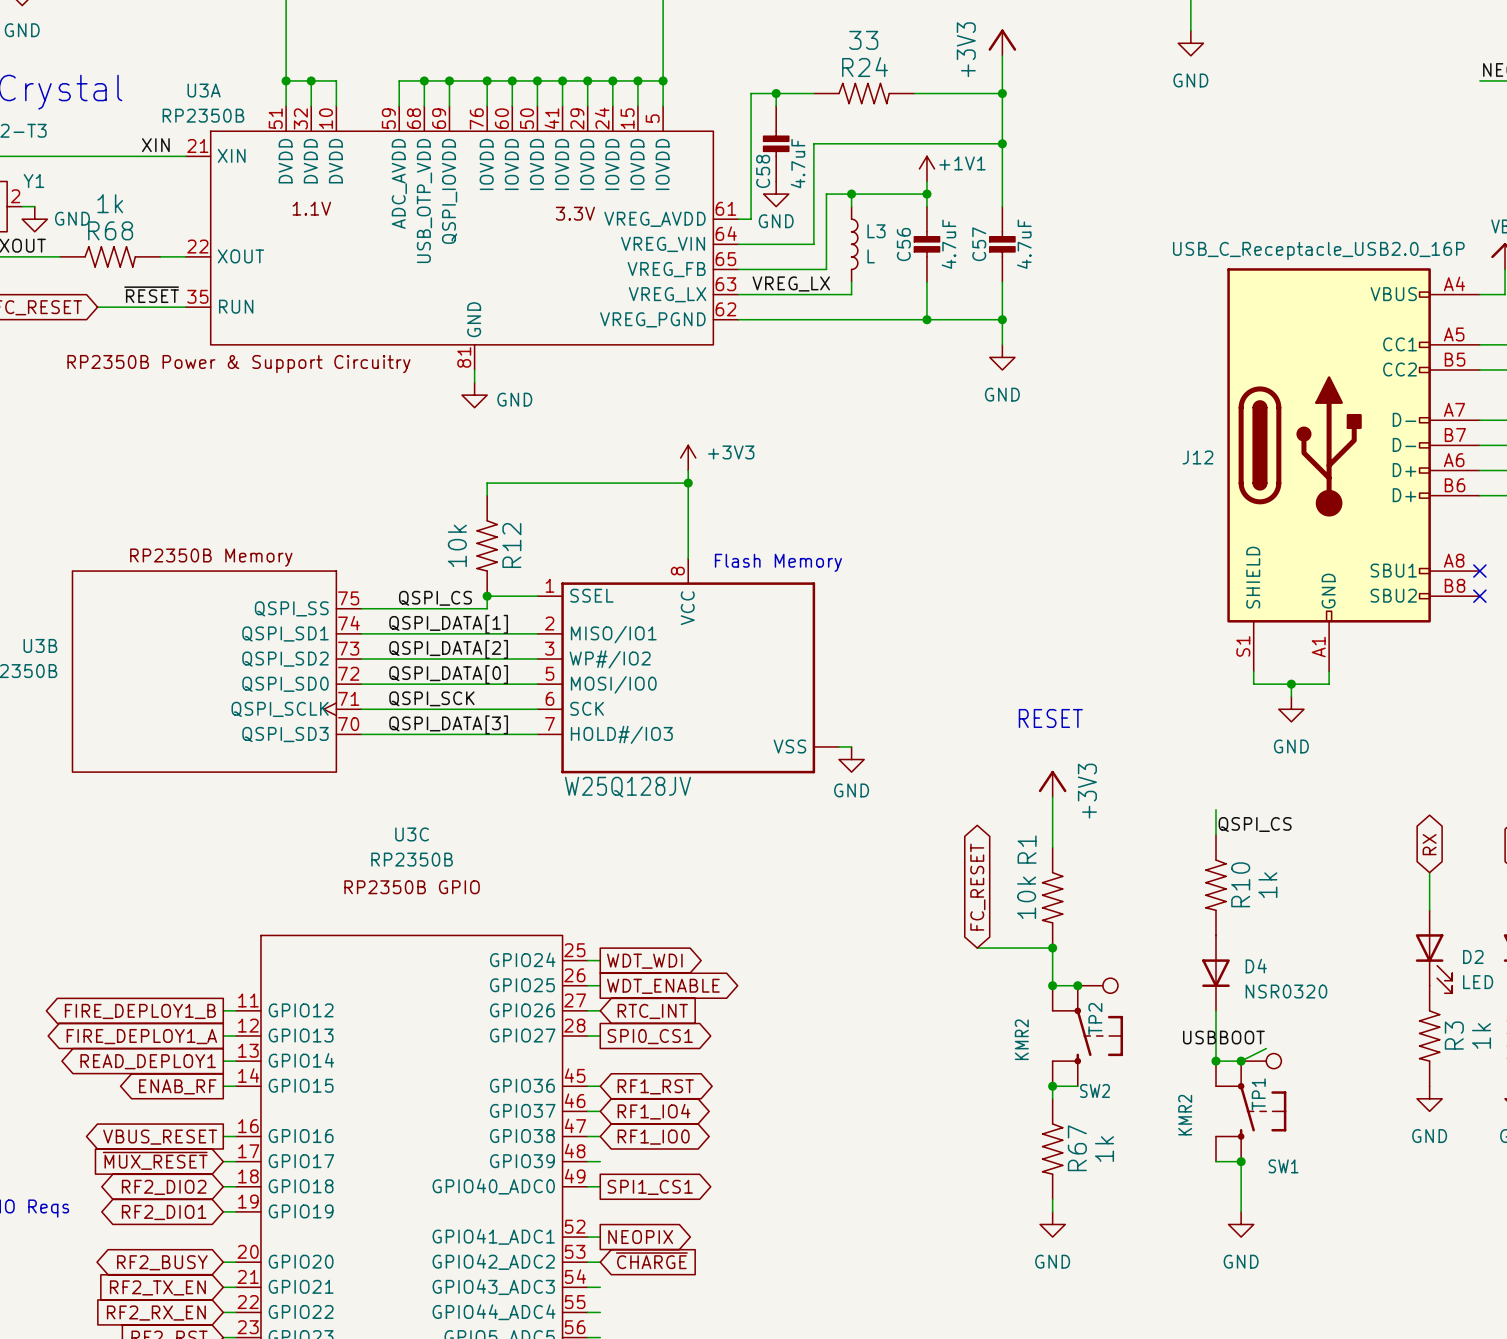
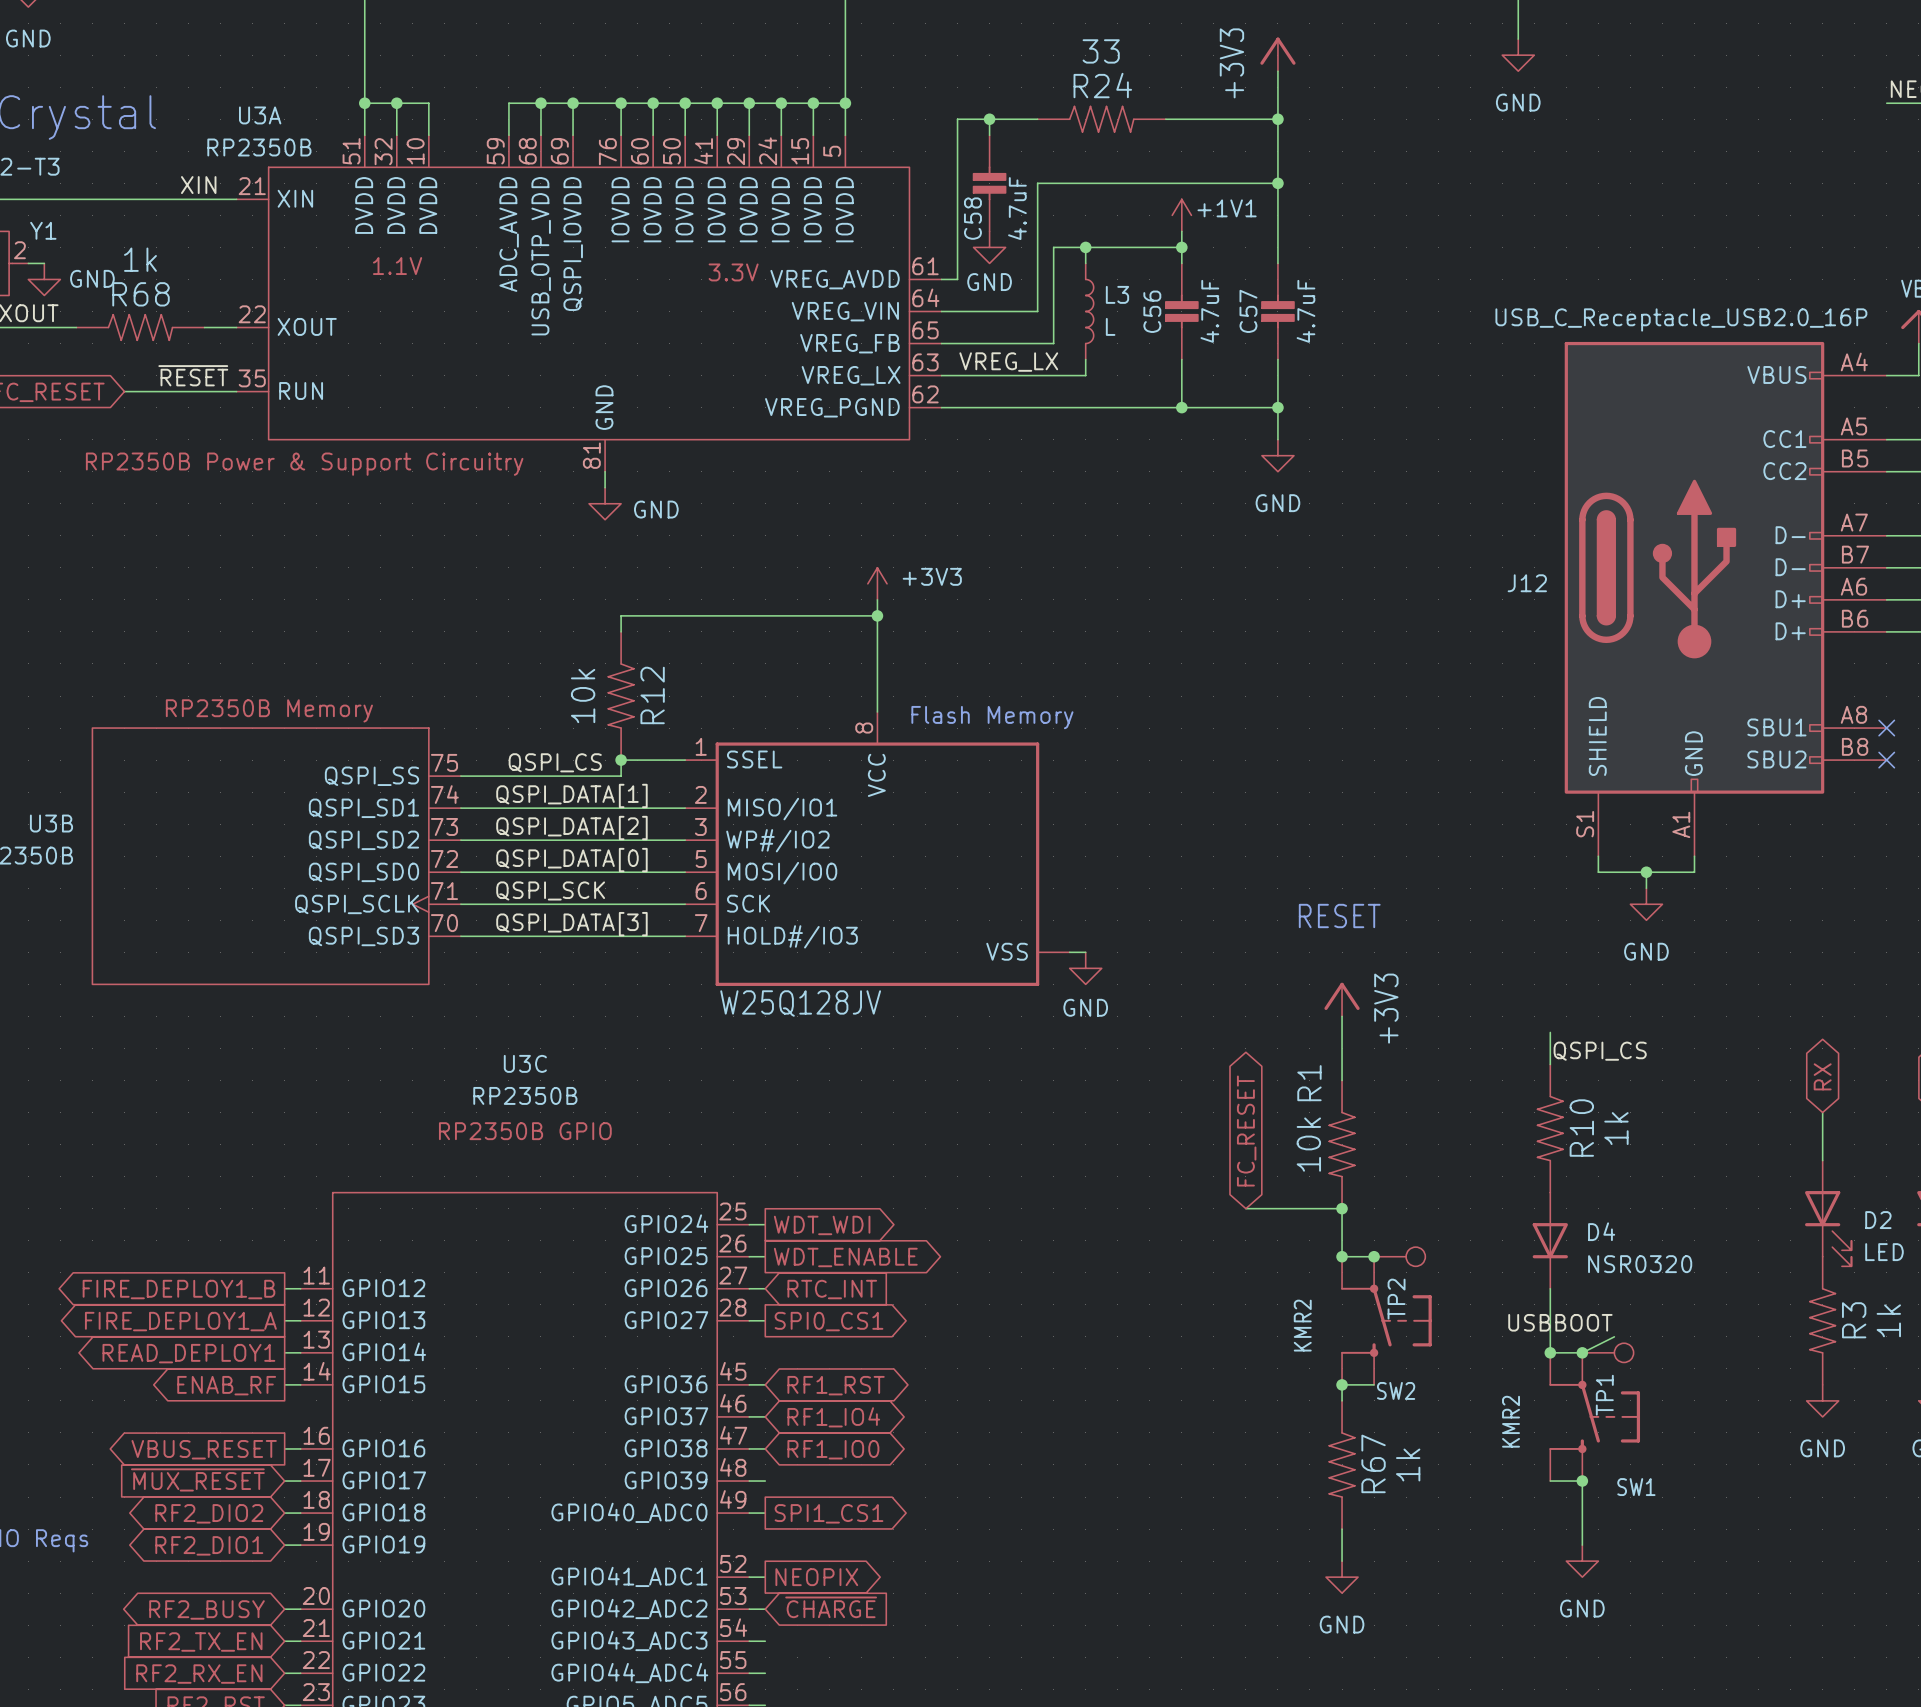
power symbol position: GND (1052, 1224) -> GND (1342, 1577)

